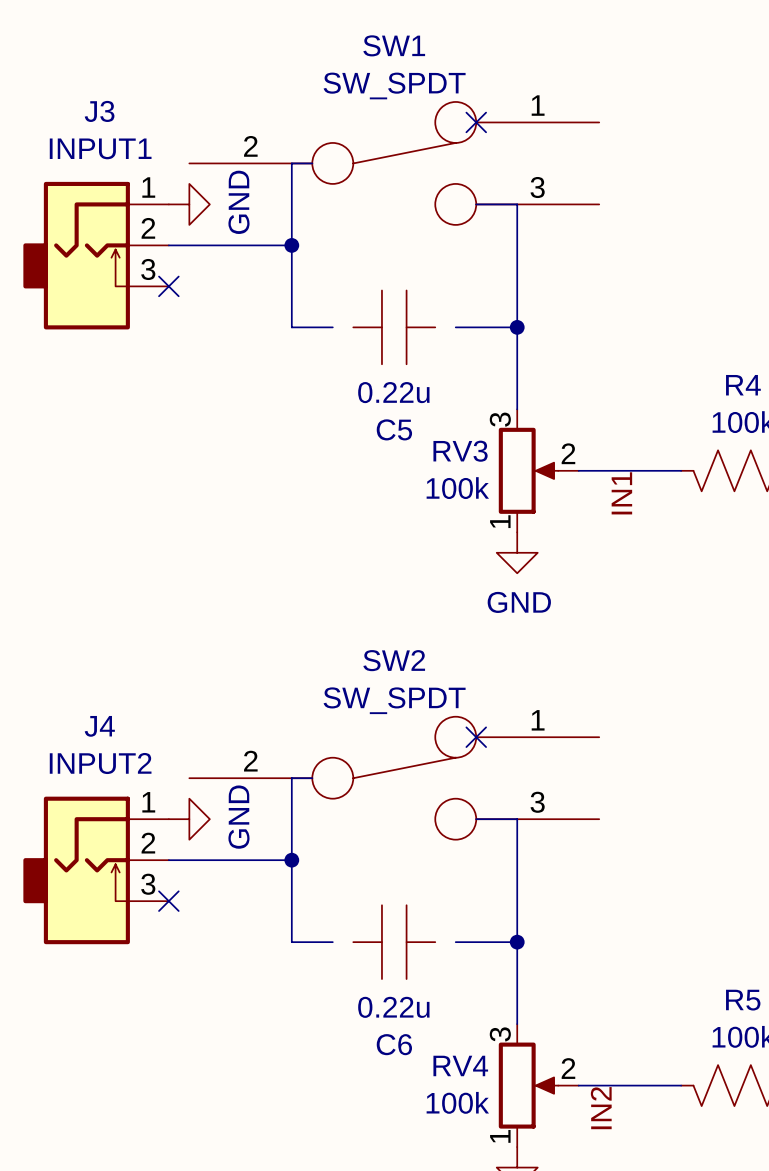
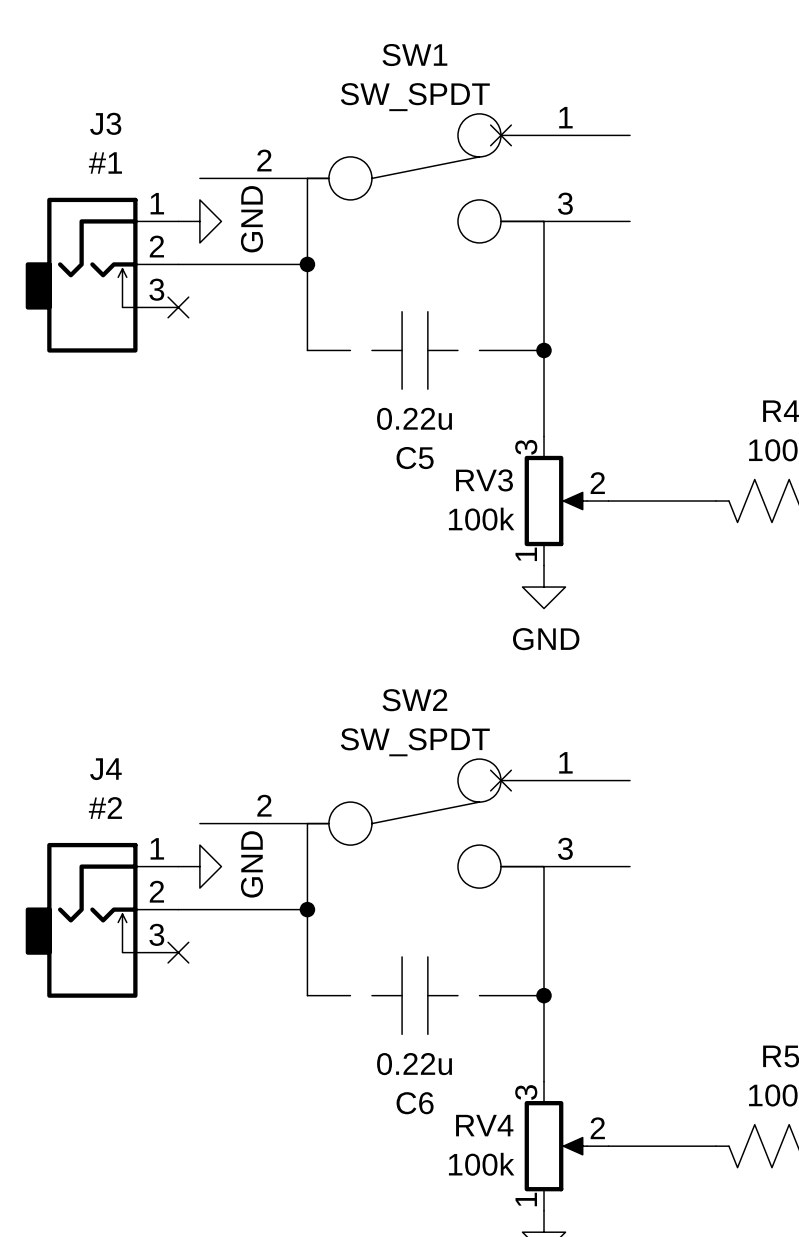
J3 value: INPUT1 (100, 148) -> #1 (105, 162)
label: IN1 (621, 493) -> none
J4 value: INPUT2 (100, 763) -> #2 (105, 808)
label: IN2 (601, 1108) -> none

